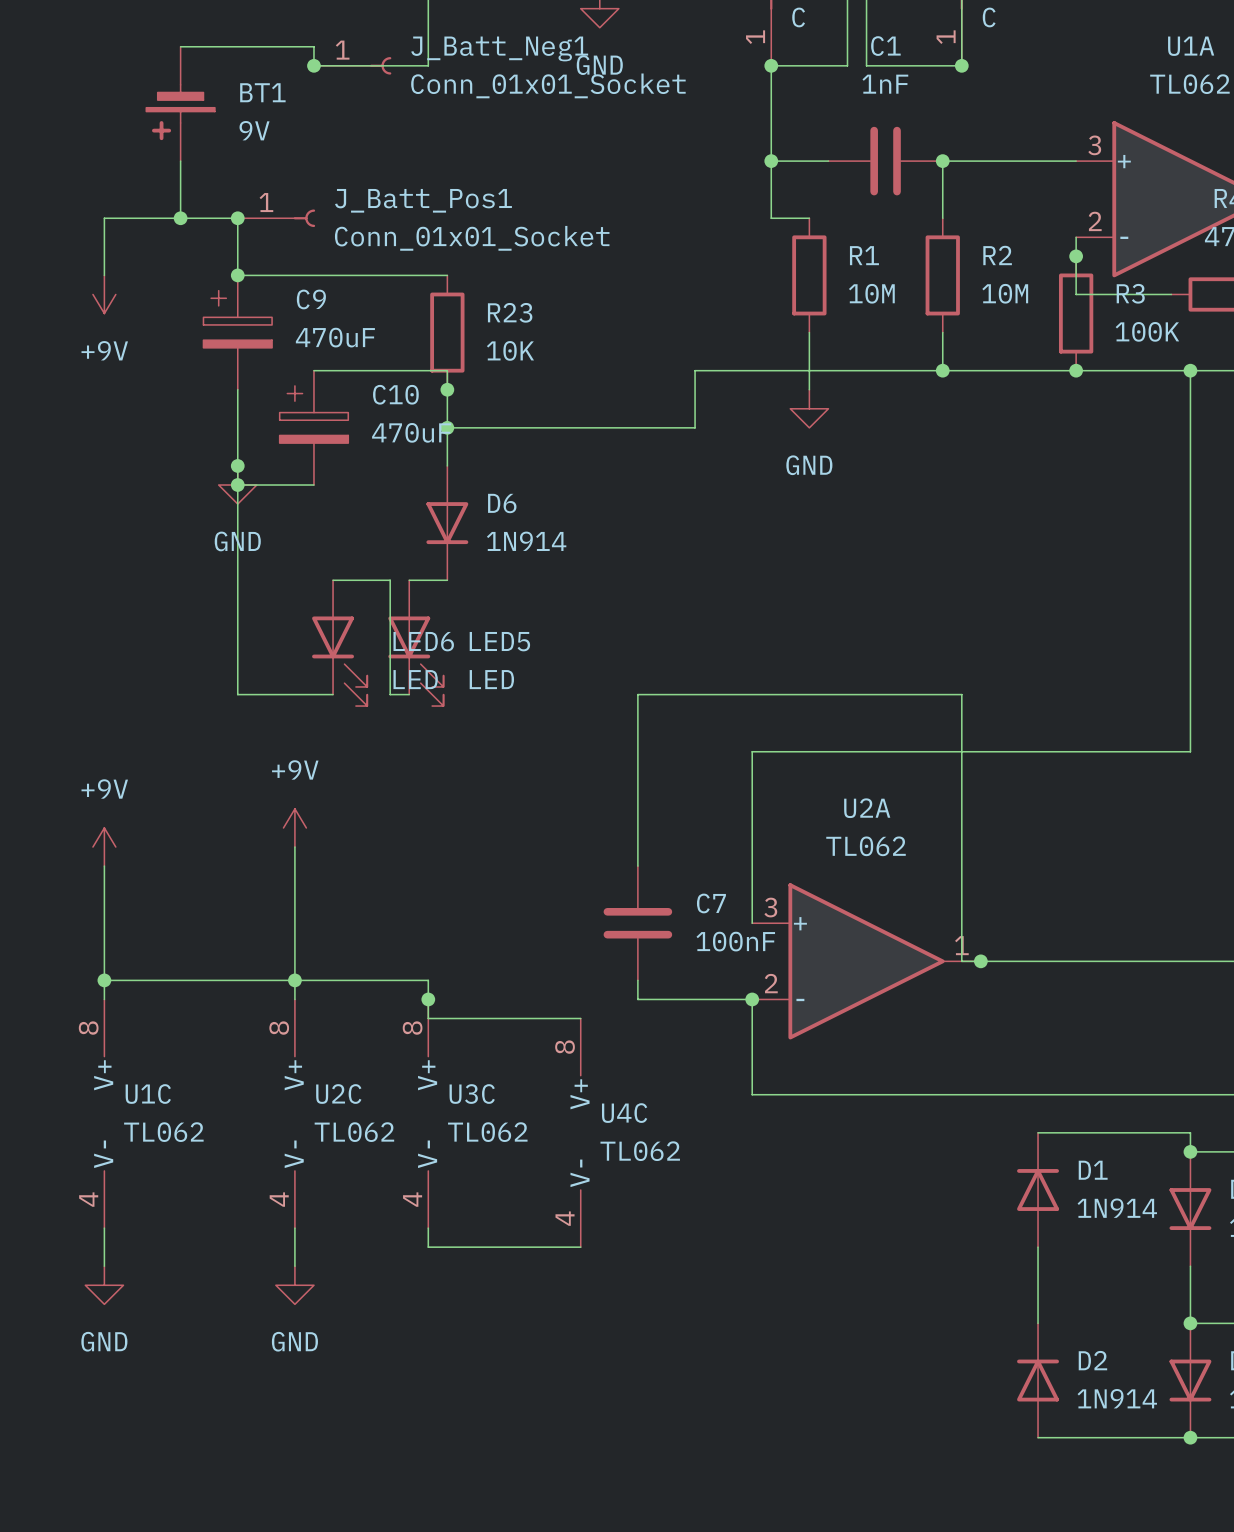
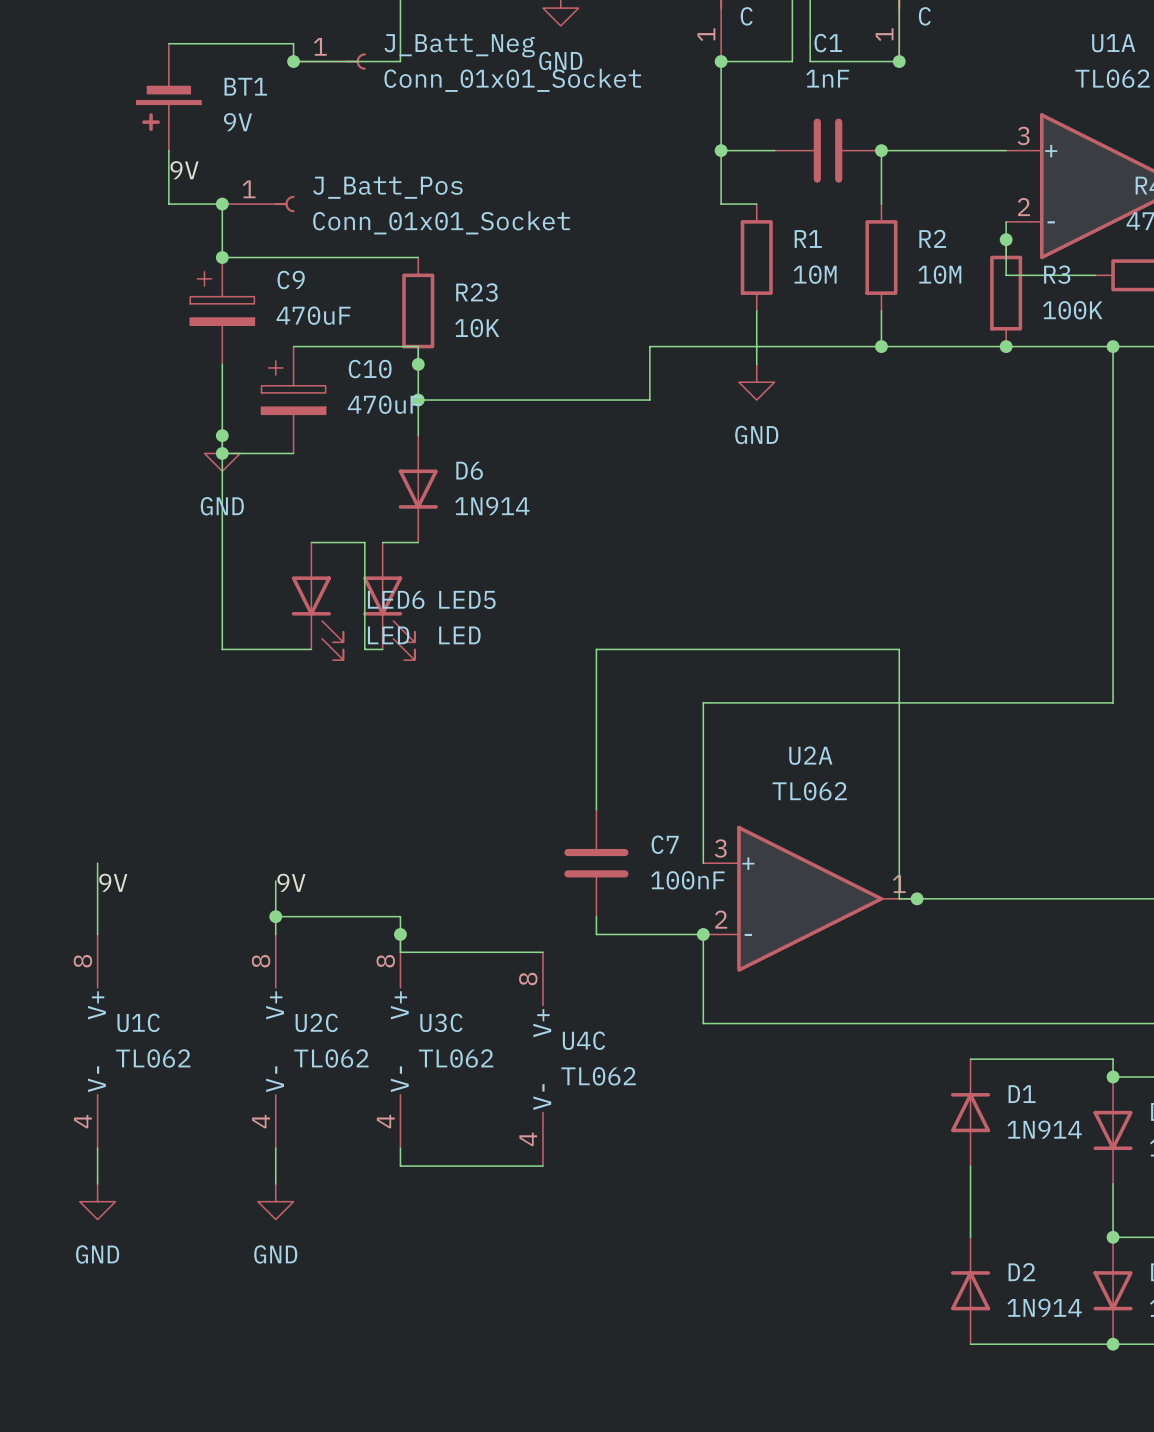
J_Batt_Neg1 name: J_Batt_Neg1 (499, 48) -> J_Batt_Neg (459, 45)
label: none -> 9V (184, 170)
J_Batt_Pos1 name: J_Batt_Pos1 (423, 200) -> J_Batt_Pos (387, 187)
wire: (180, 218) (104, 218) (104, 275) -> none
junction: (180, 218) -> none
power symbol: +9V (104, 294) -> none
power symbol: +9V (294, 827) -> none
power symbol: +9V (104, 847) -> none
wire: (294, 847) (294, 942) -> none
wire: (104, 866) (104, 923) -> none
label: none -> 9V (113, 882)
label: none -> 9V (291, 882)
wire: (104, 980) (294, 980) -> none
junction: (104, 980) -> none

